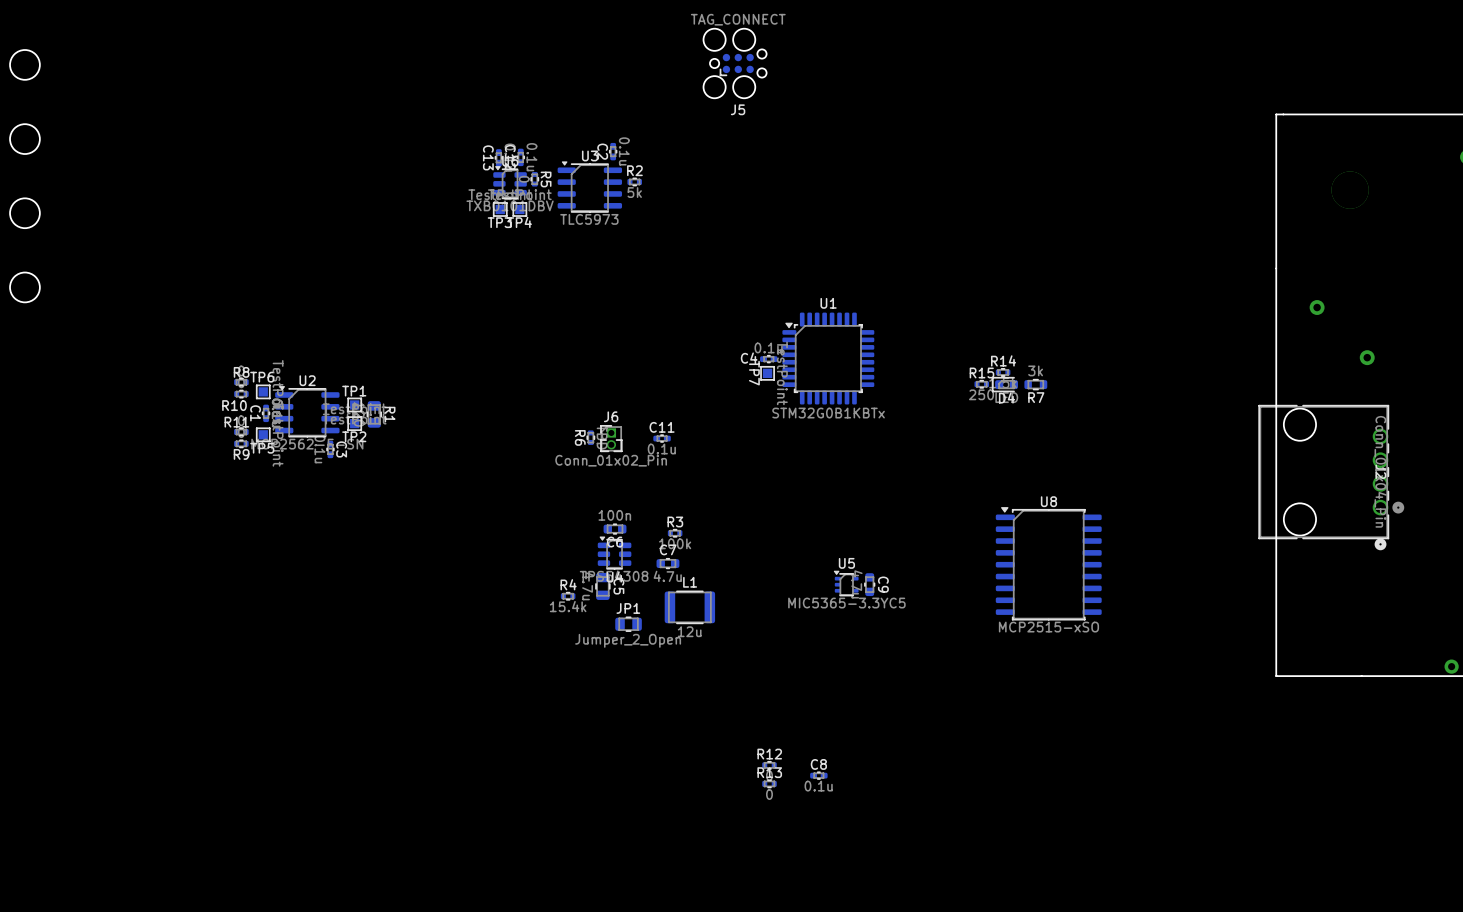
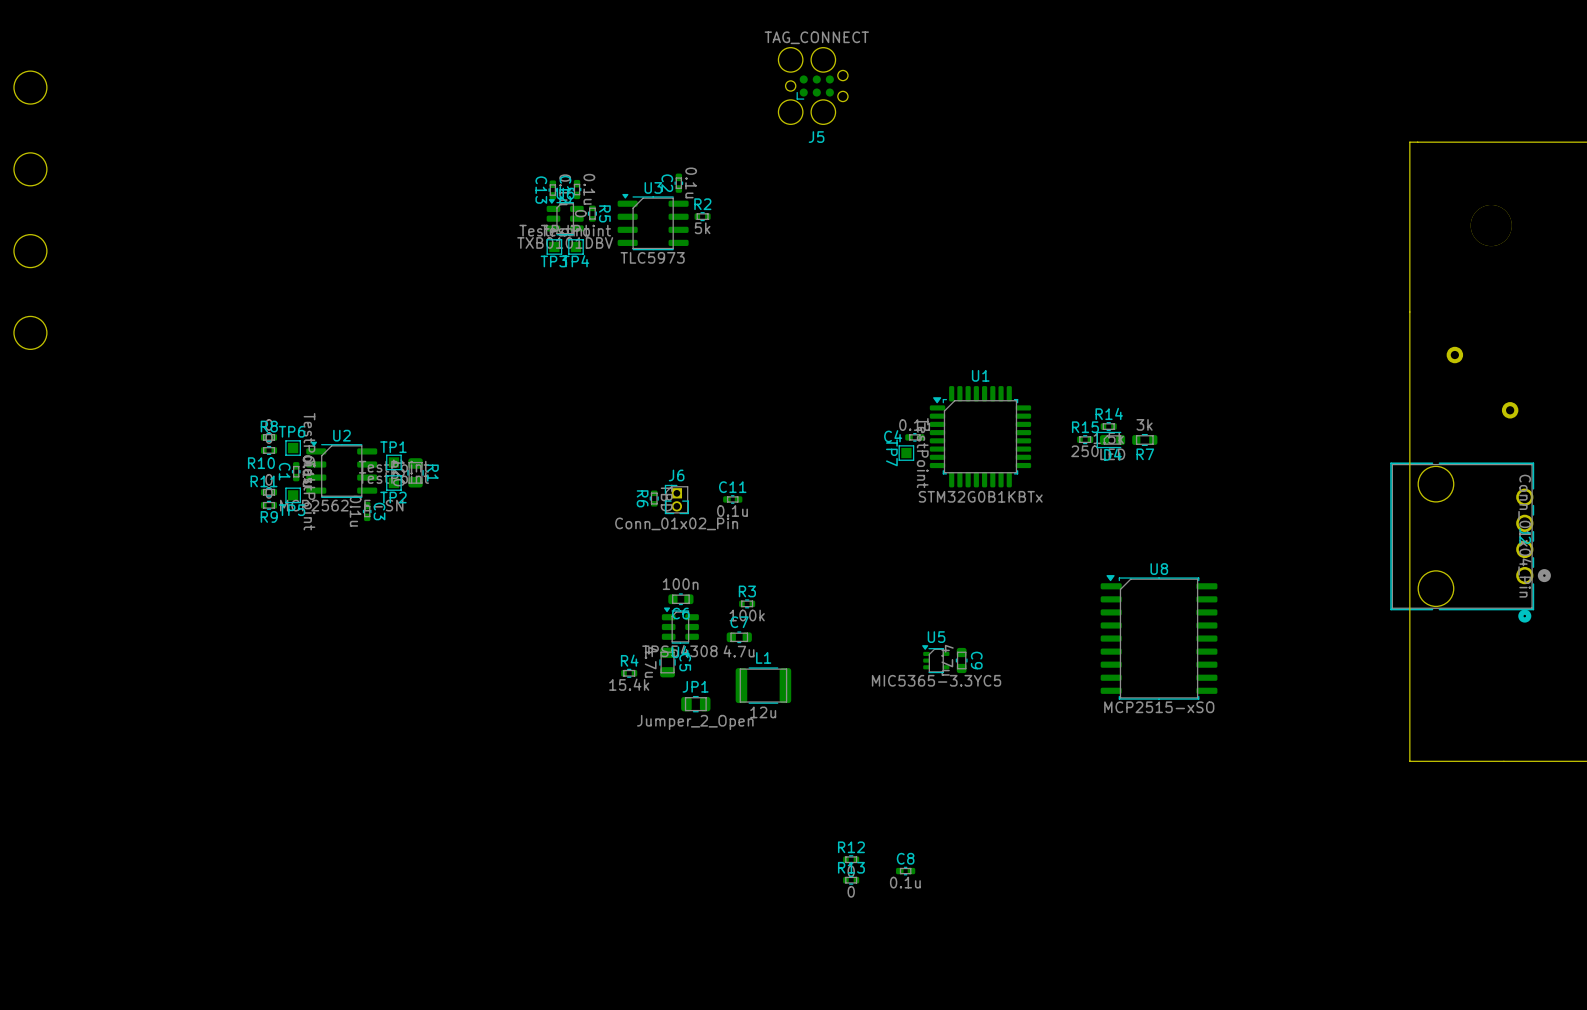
U1 position: (828, 358) -> (980, 436)
C4 position: (768, 359) -> (914, 437)
TP7 position: (767, 373) -> (906, 453)

